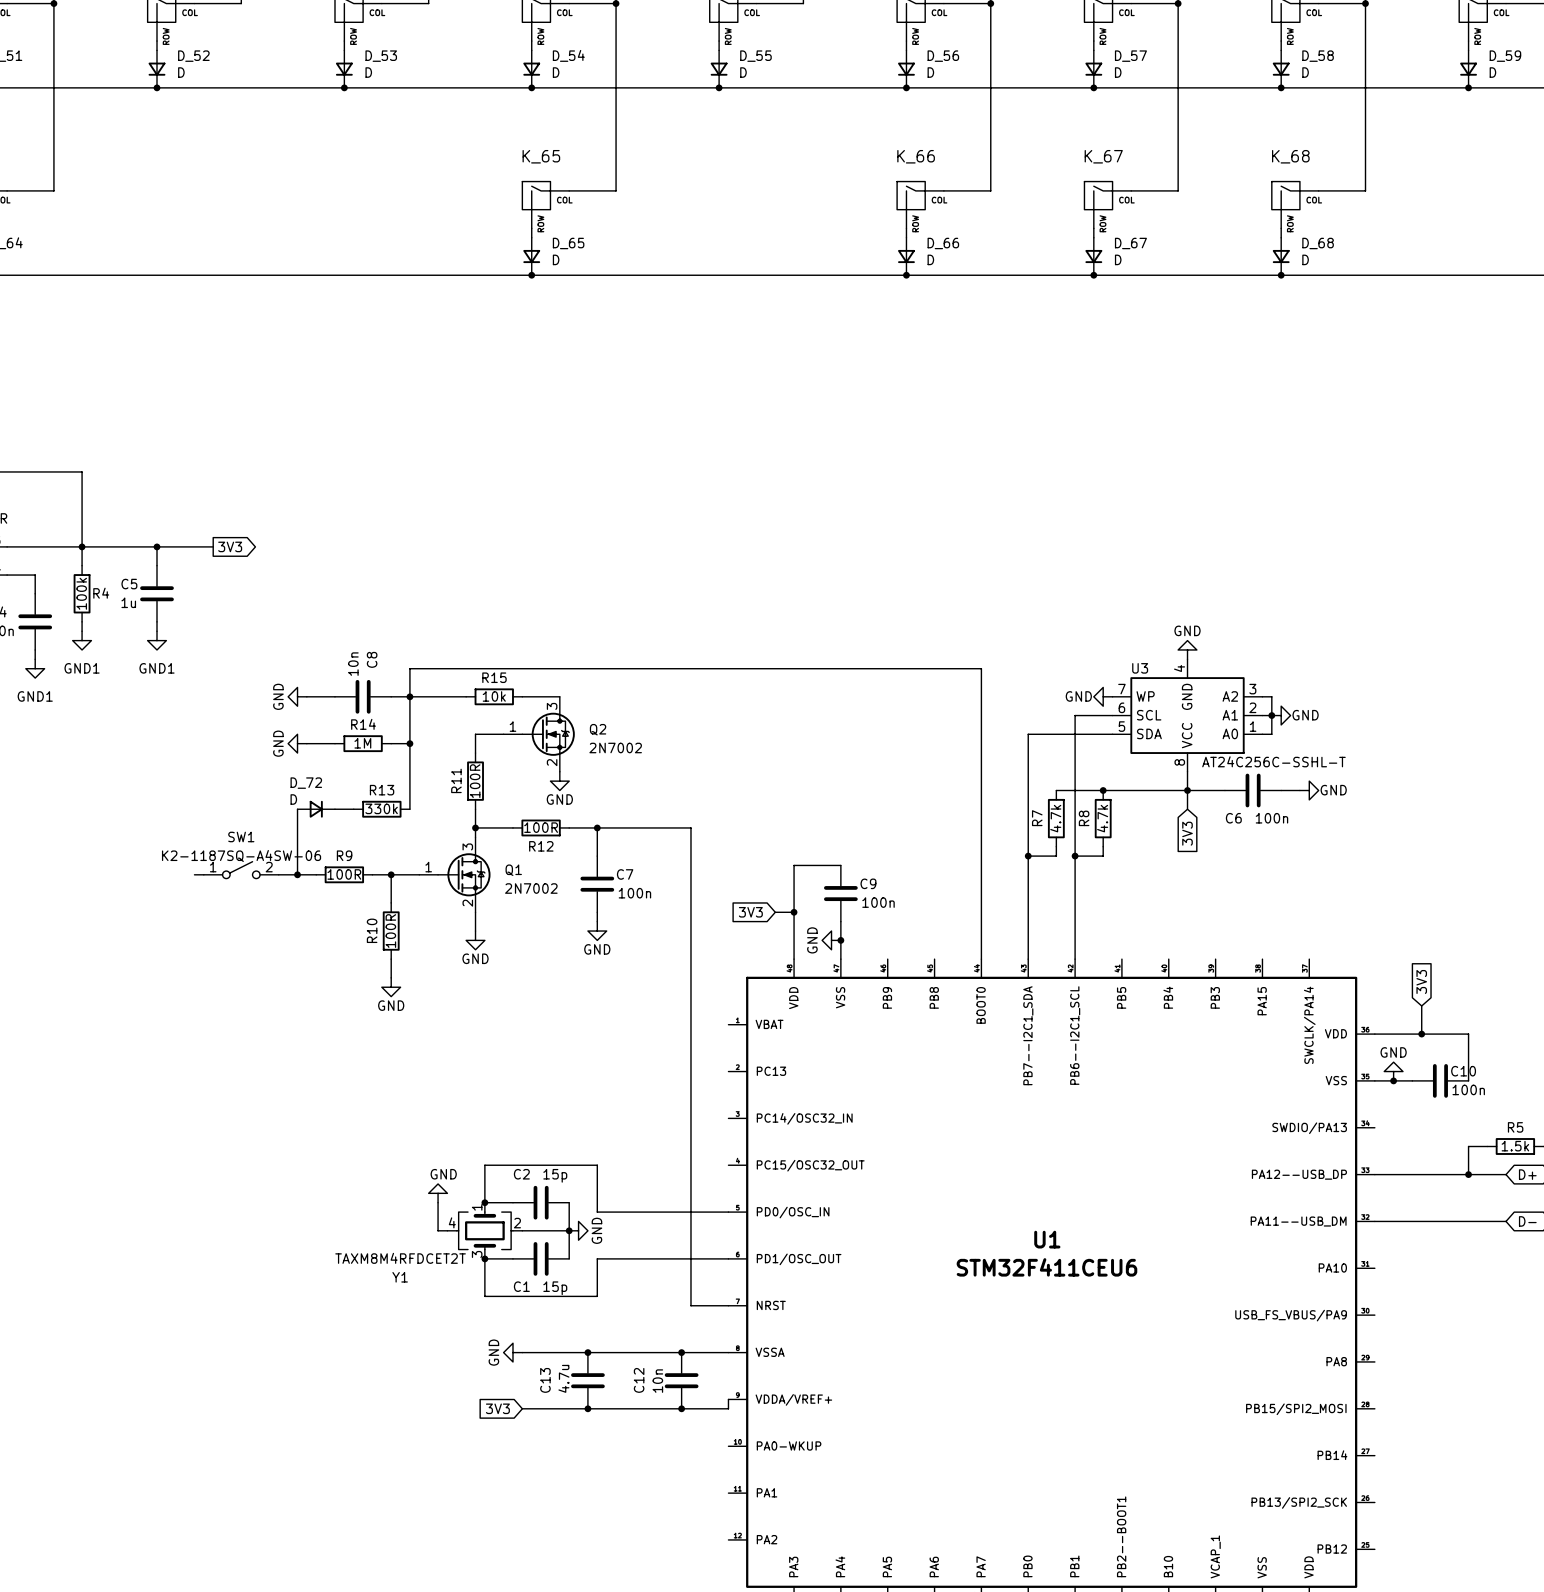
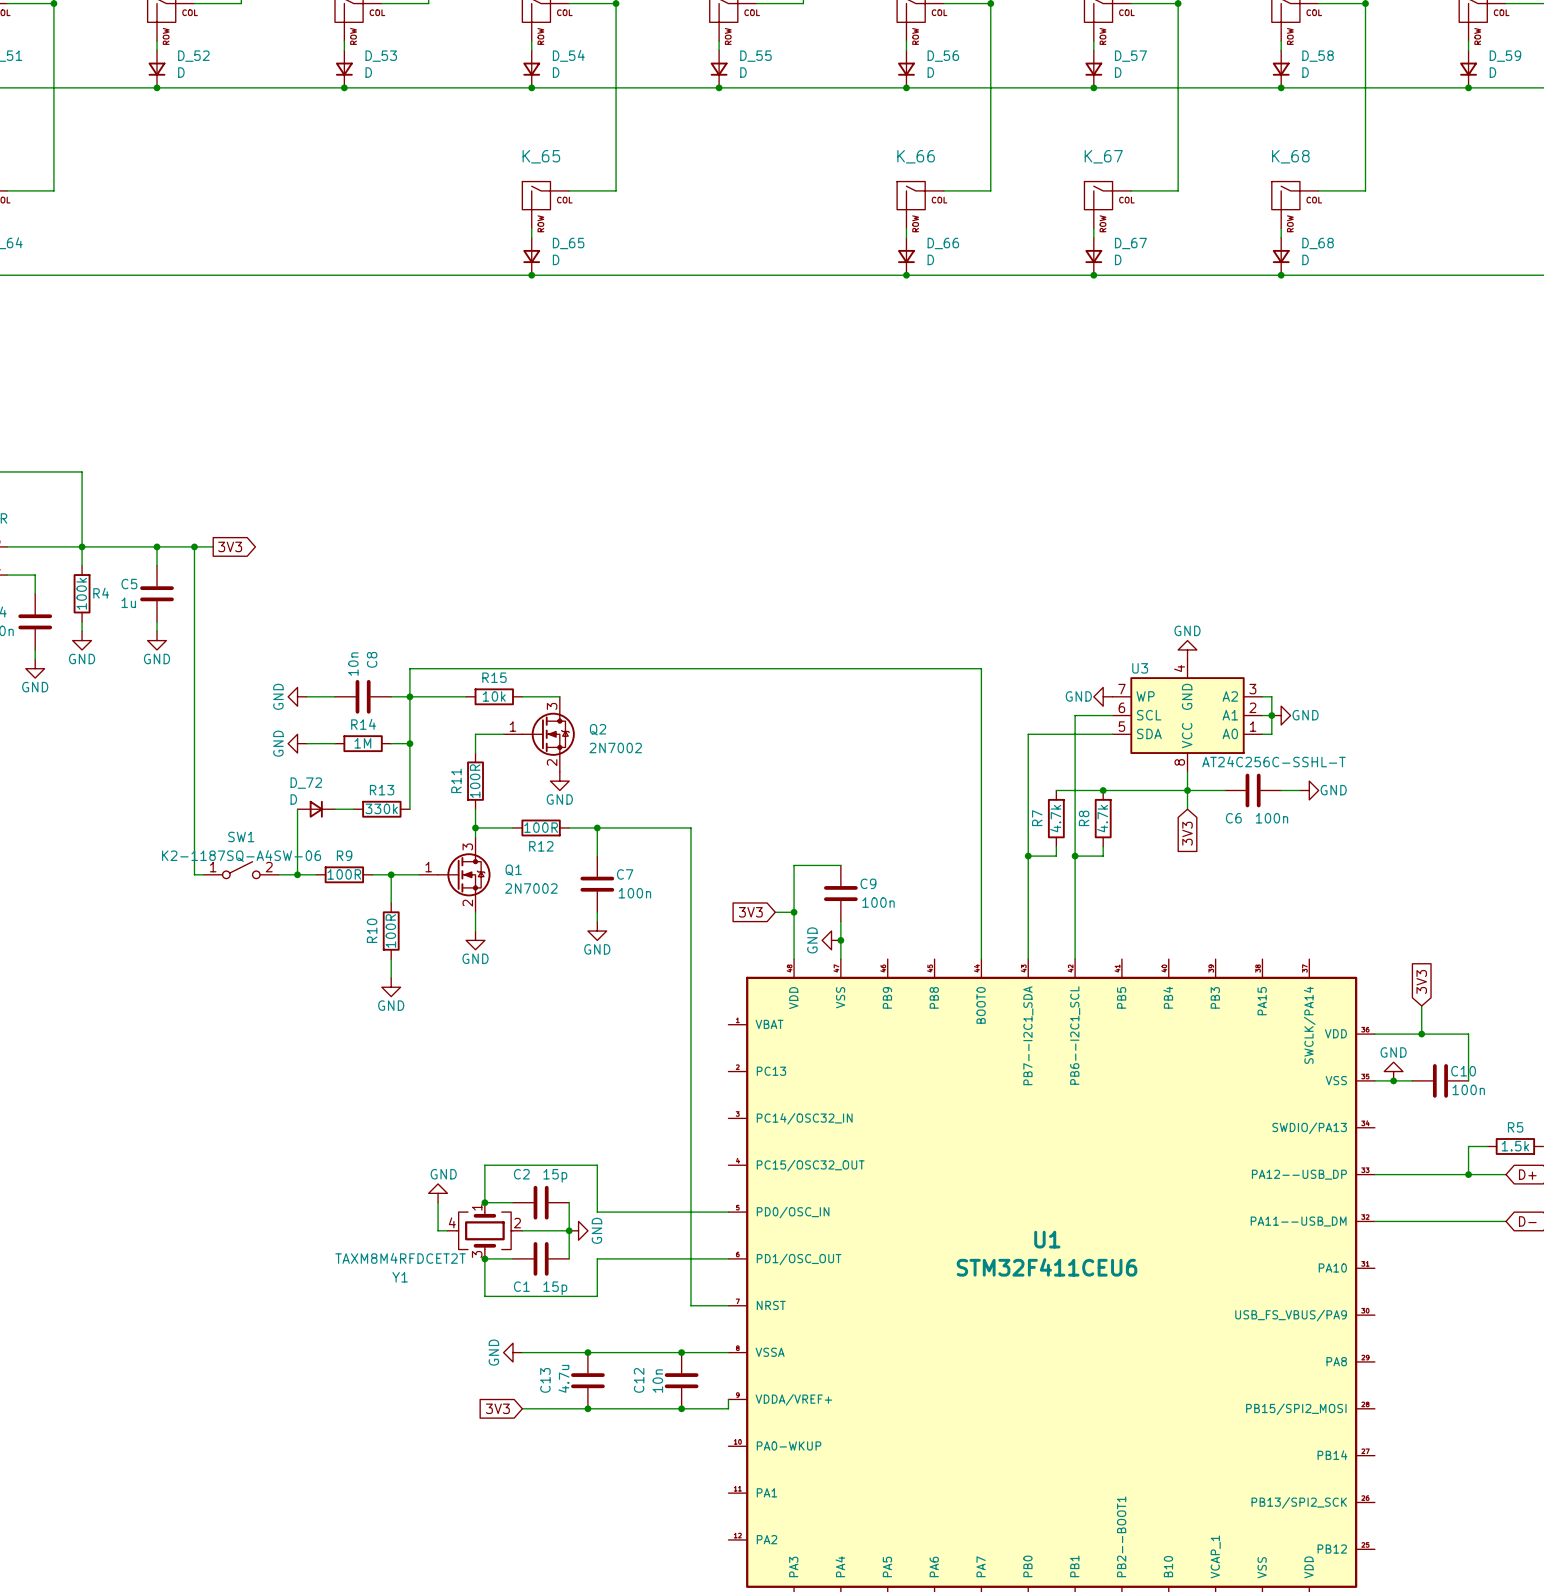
wire: none -> (194, 546) (194, 874)
junction: none -> (194, 546)
power symbol: GND1 (82, 640) -> GND (82, 640)
power symbol: GND1 (156, 640) -> GND (156, 640)
power symbol: GND1 (35, 668) -> GND (35, 668)

